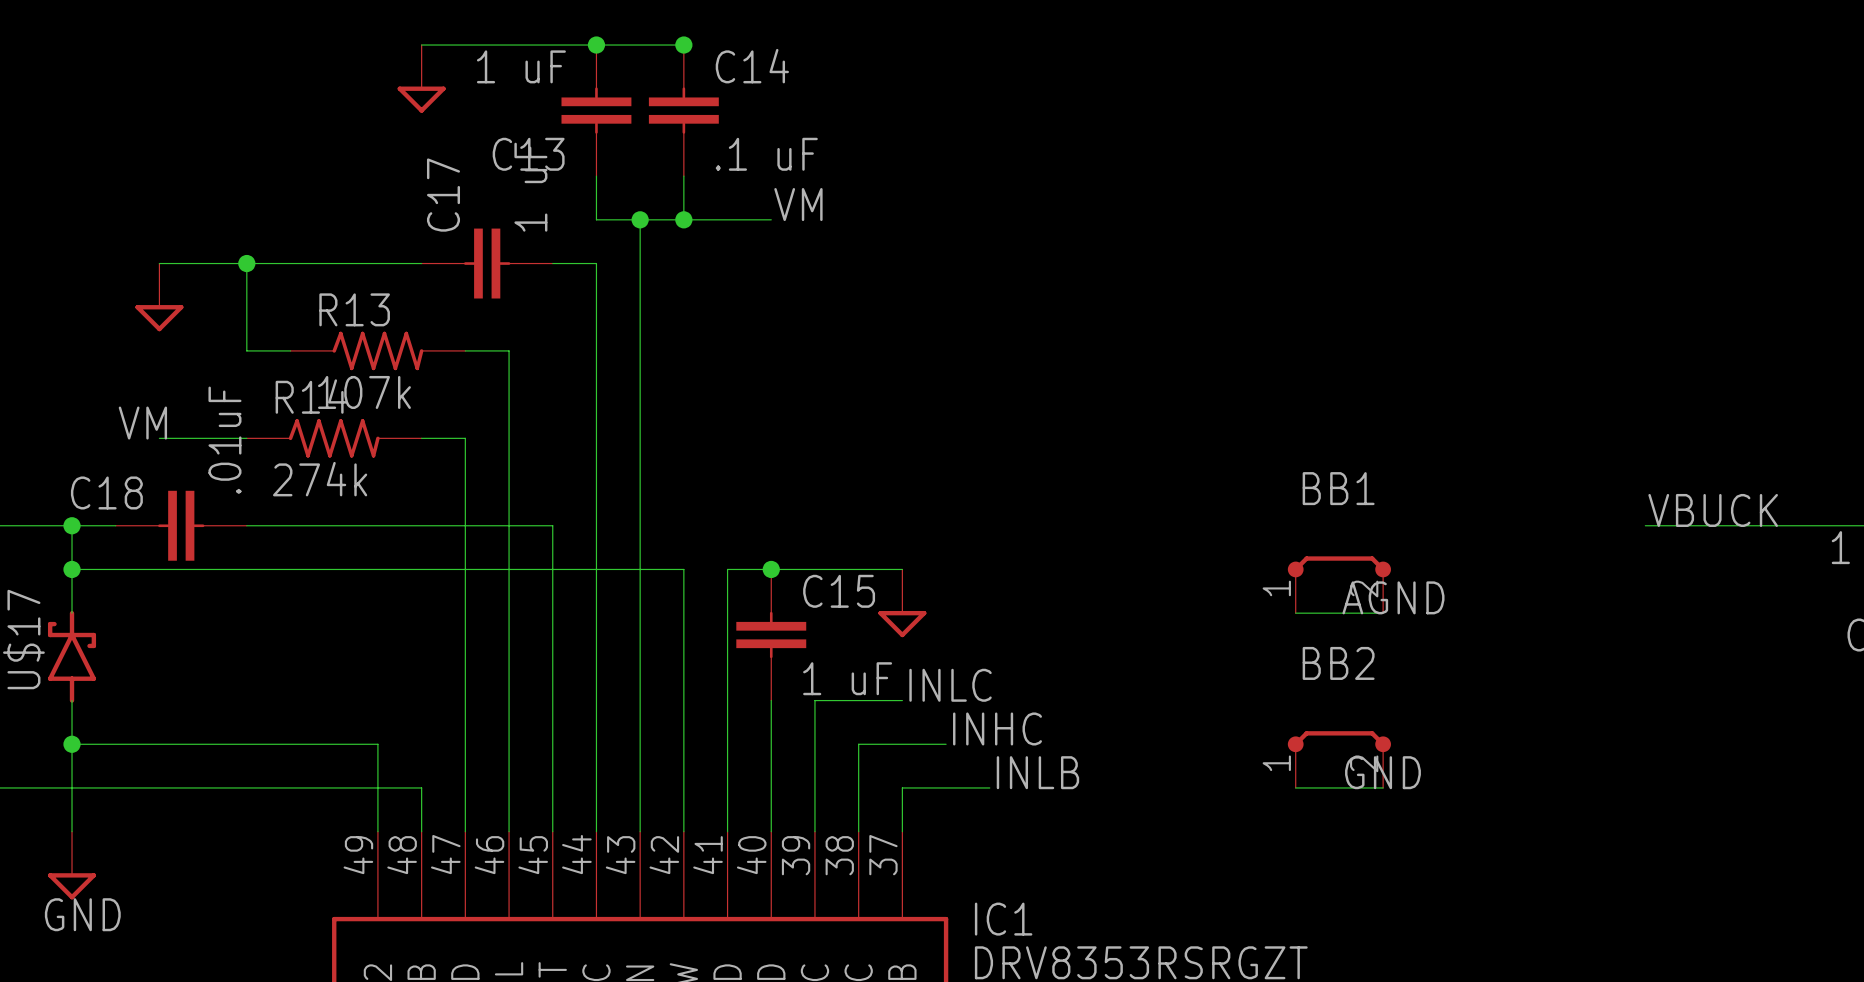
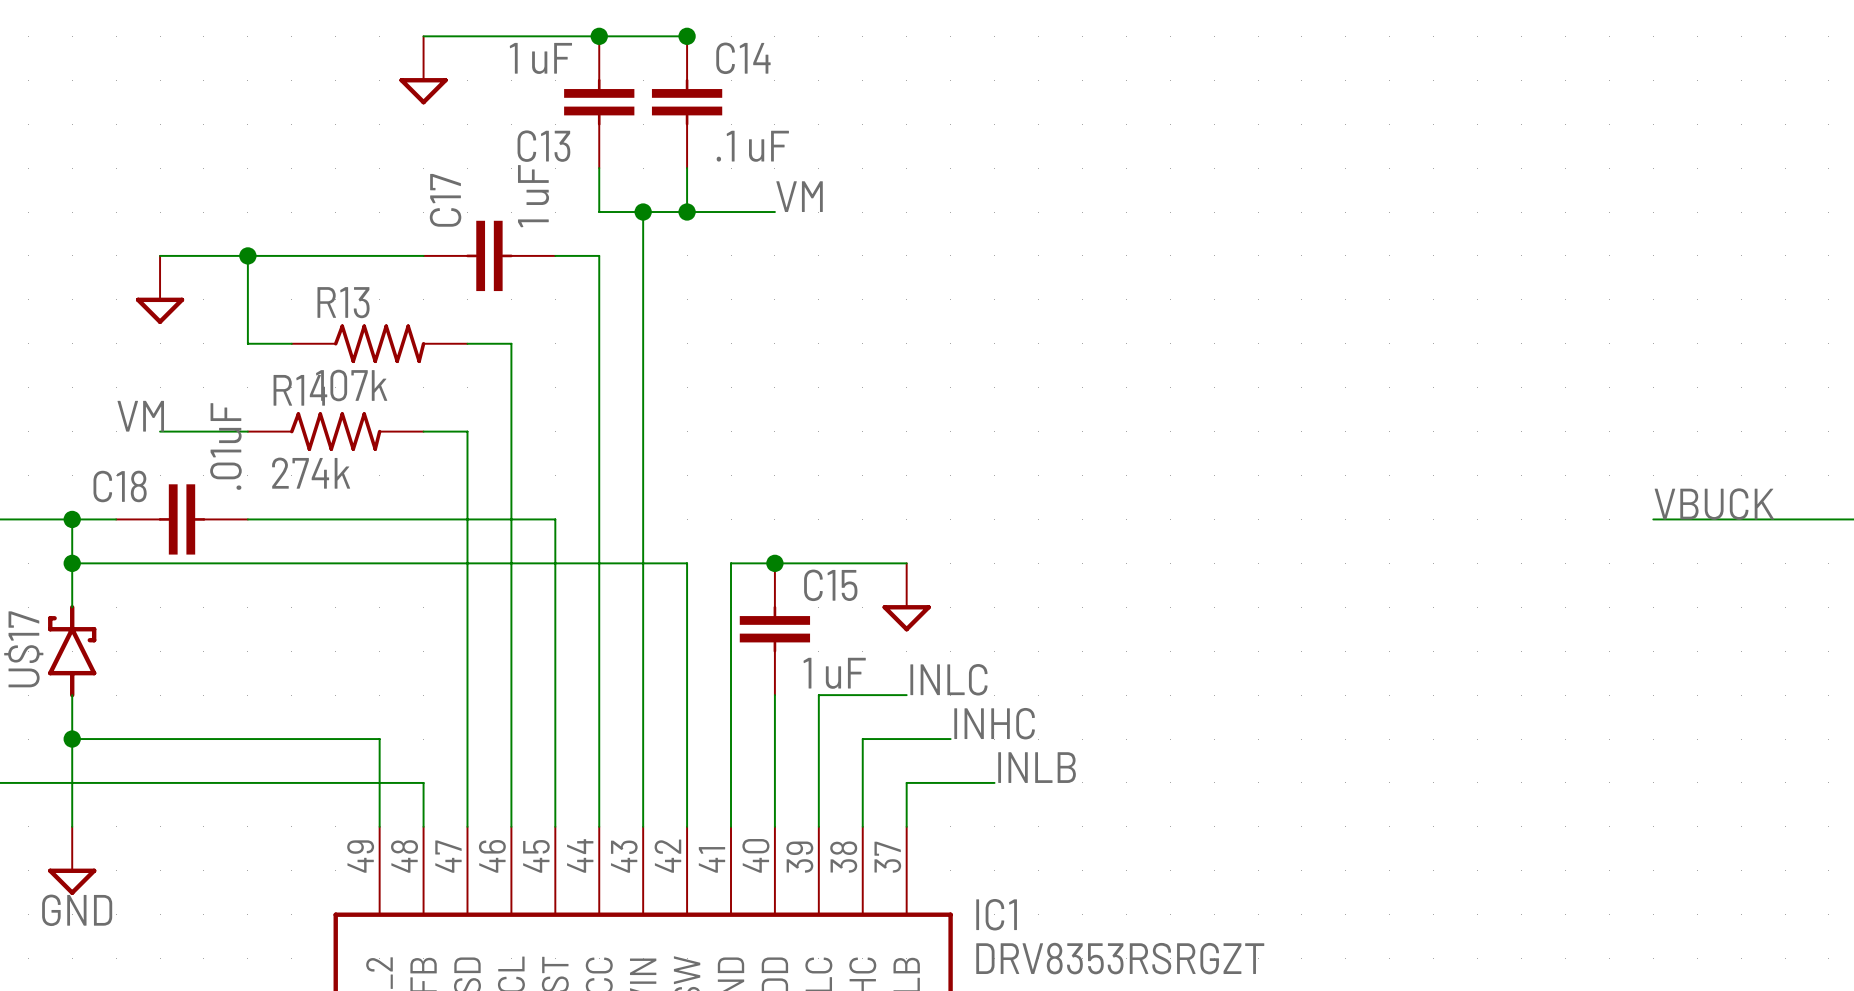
BB1: (1339, 584) -> none
label: AGND (1393, 597) -> none
wire: (1295, 613) (1383, 613) -> none
BB2: (1339, 759) -> none
label: GND (1382, 772) -> none
wire: (1295, 787) (1383, 787) -> none

